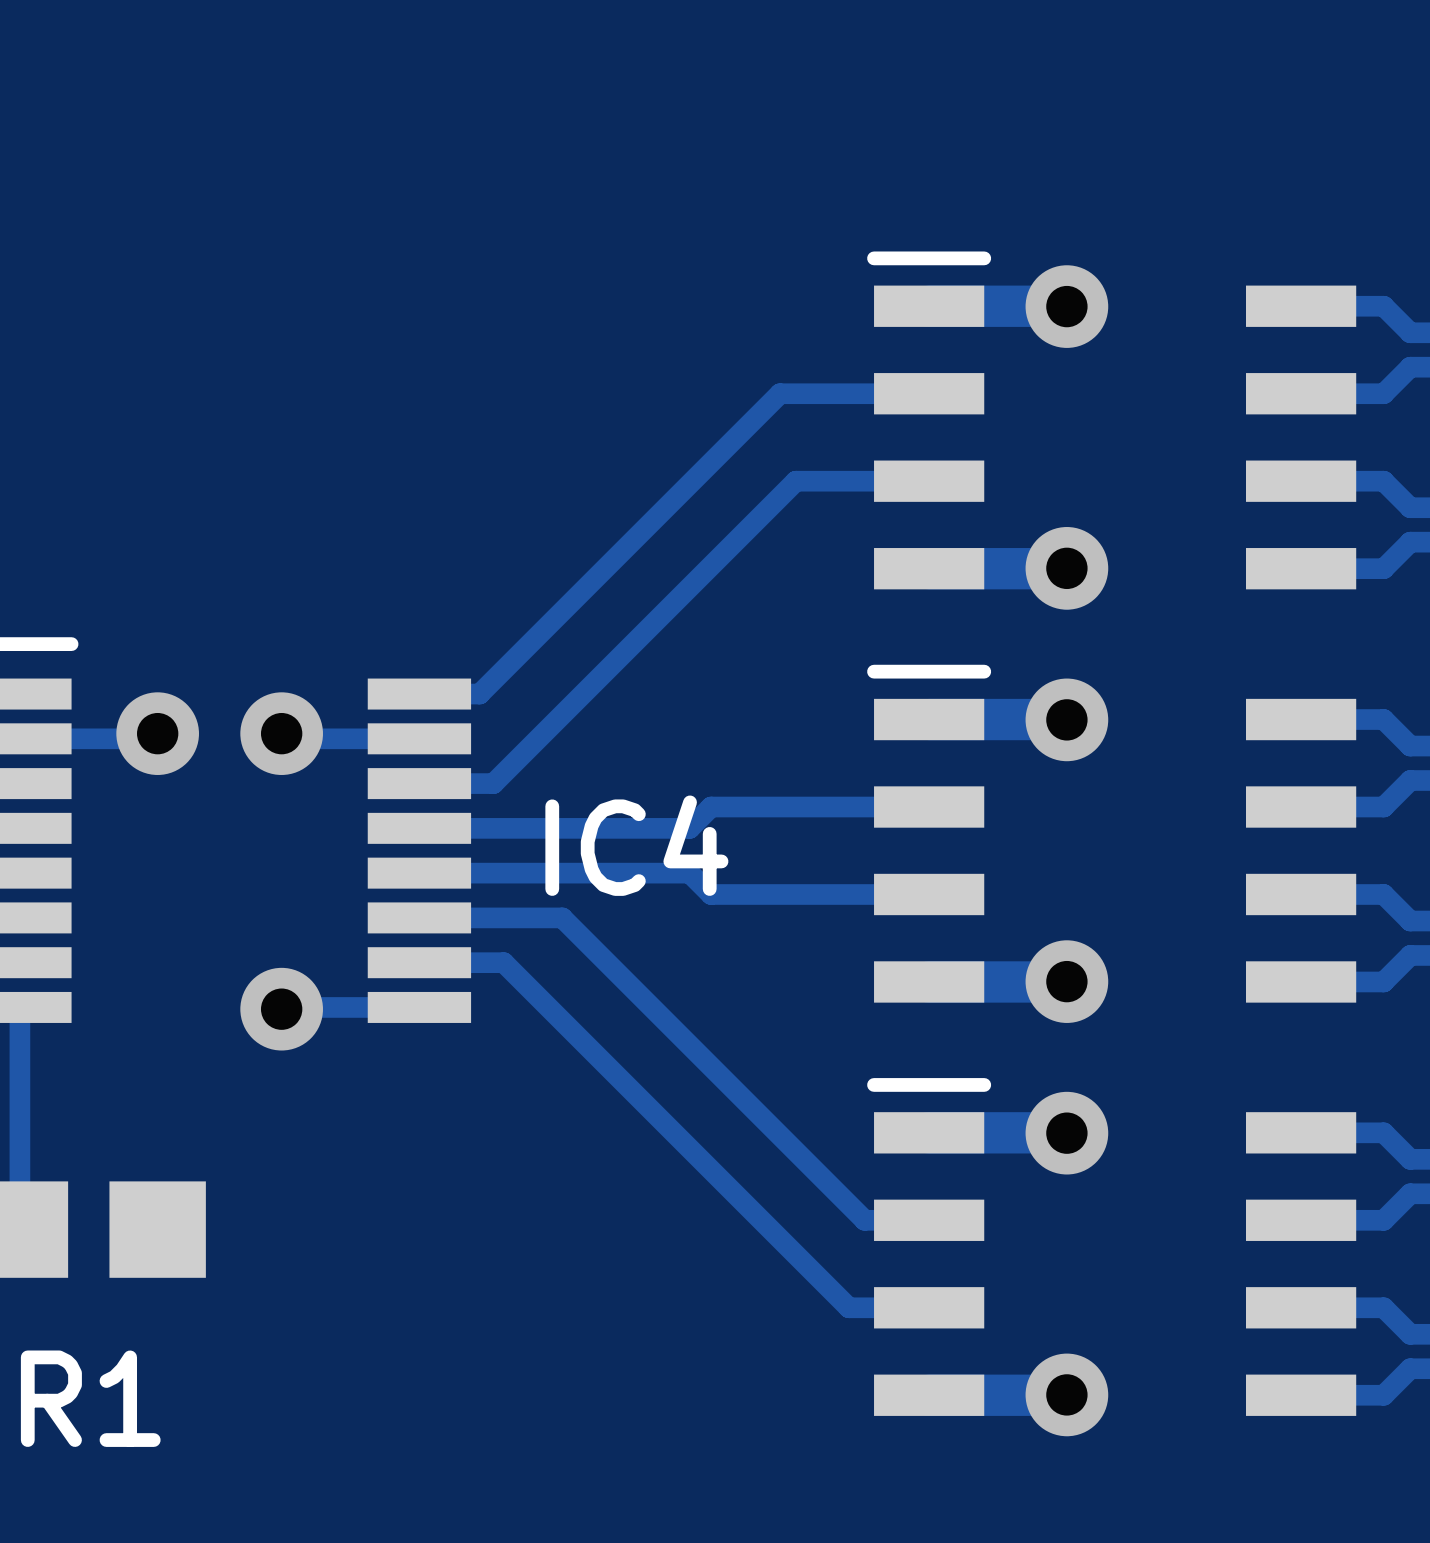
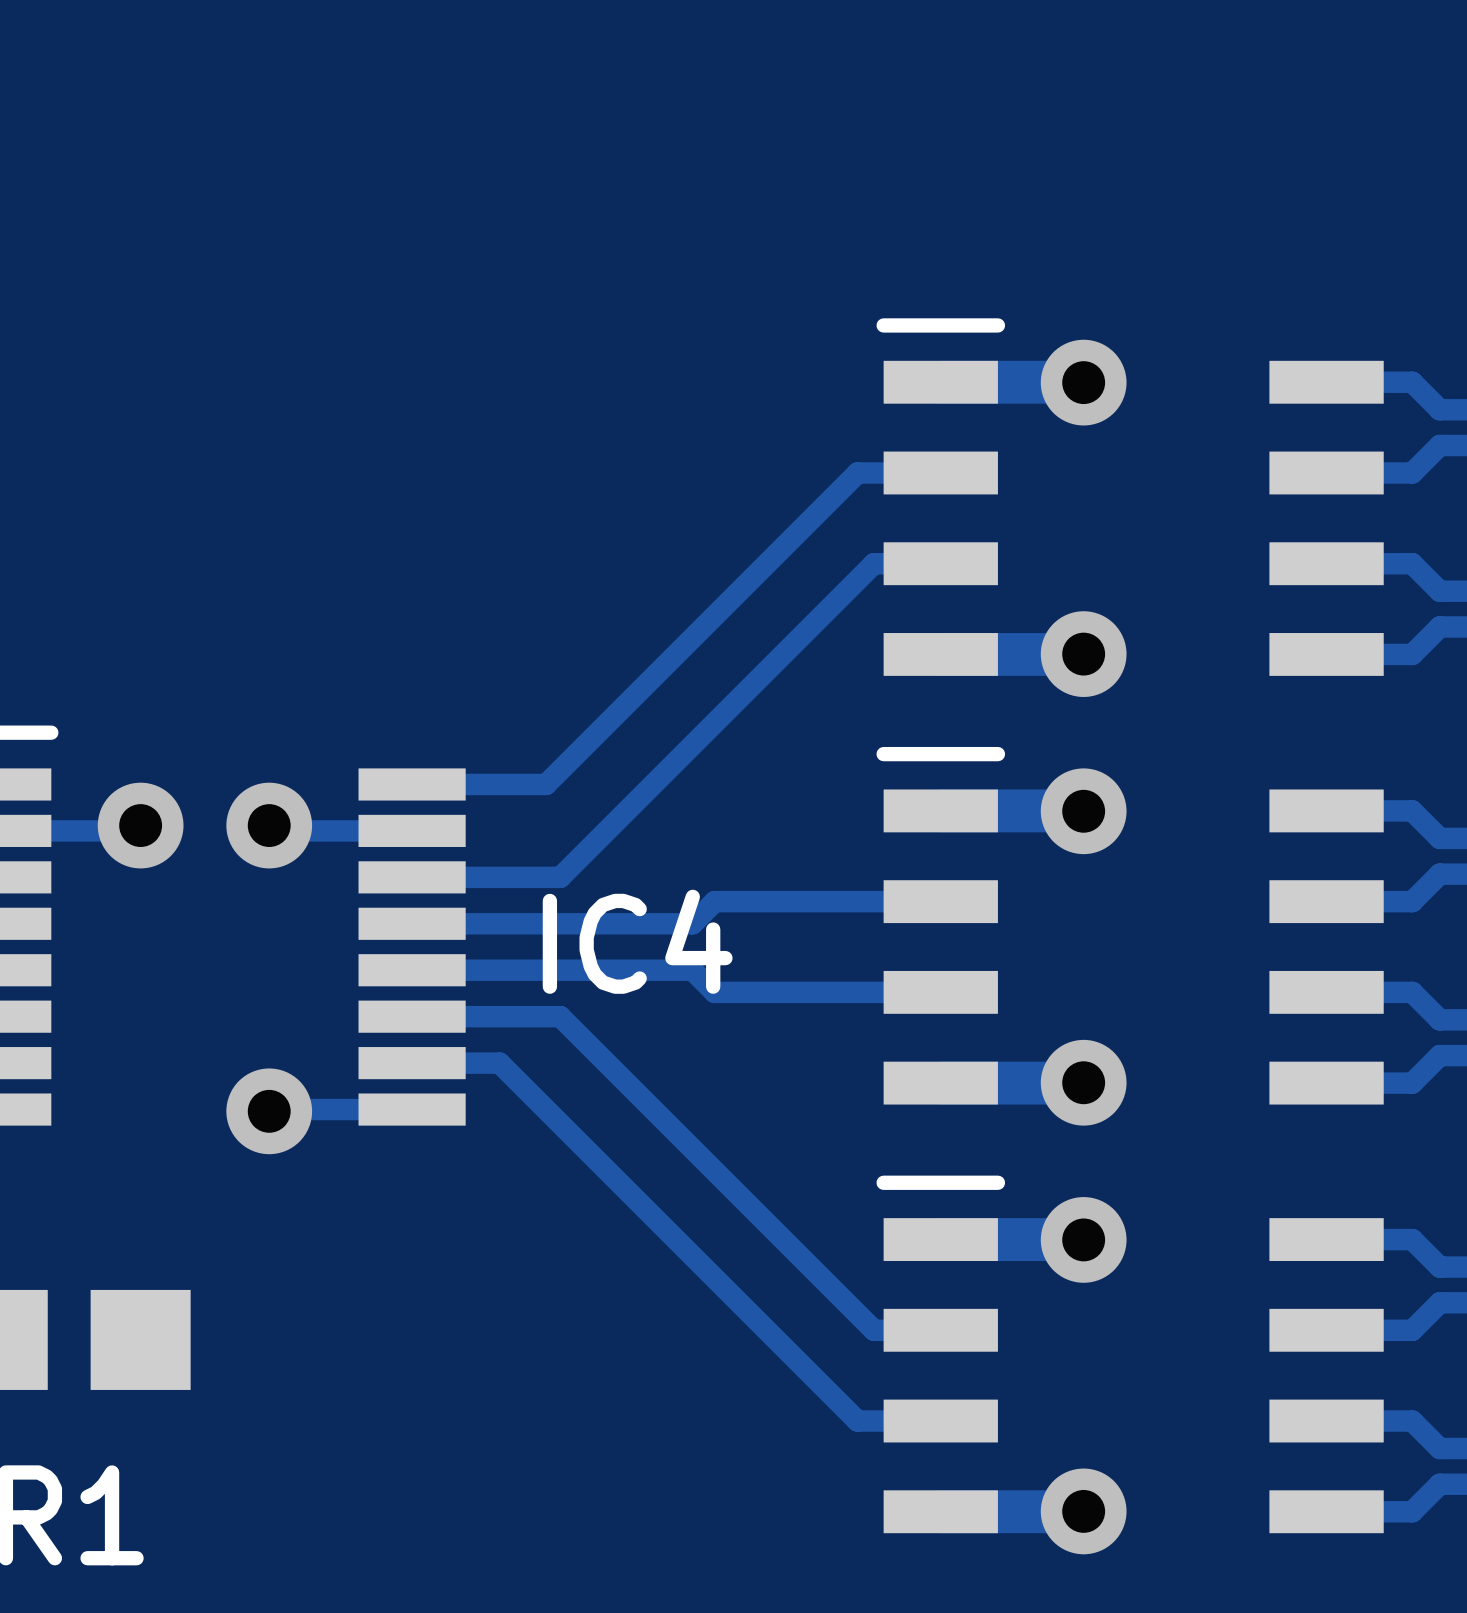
part footprint: [867, 251, 1357, 590] -> [876, 318, 1384, 676]
track: (848, 393) (780, 393) (479, 694) -> (857, 472) (546, 784) (474, 784)
track: (864, 481) (795, 481) (493, 783) -> (873, 563) (560, 877) (488, 877)
part footprint: [867, 664, 1357, 1003] -> [876, 746, 1384, 1105]
part footprint: [867, 1078, 1357, 1416] -> [876, 1175, 1384, 1534]

